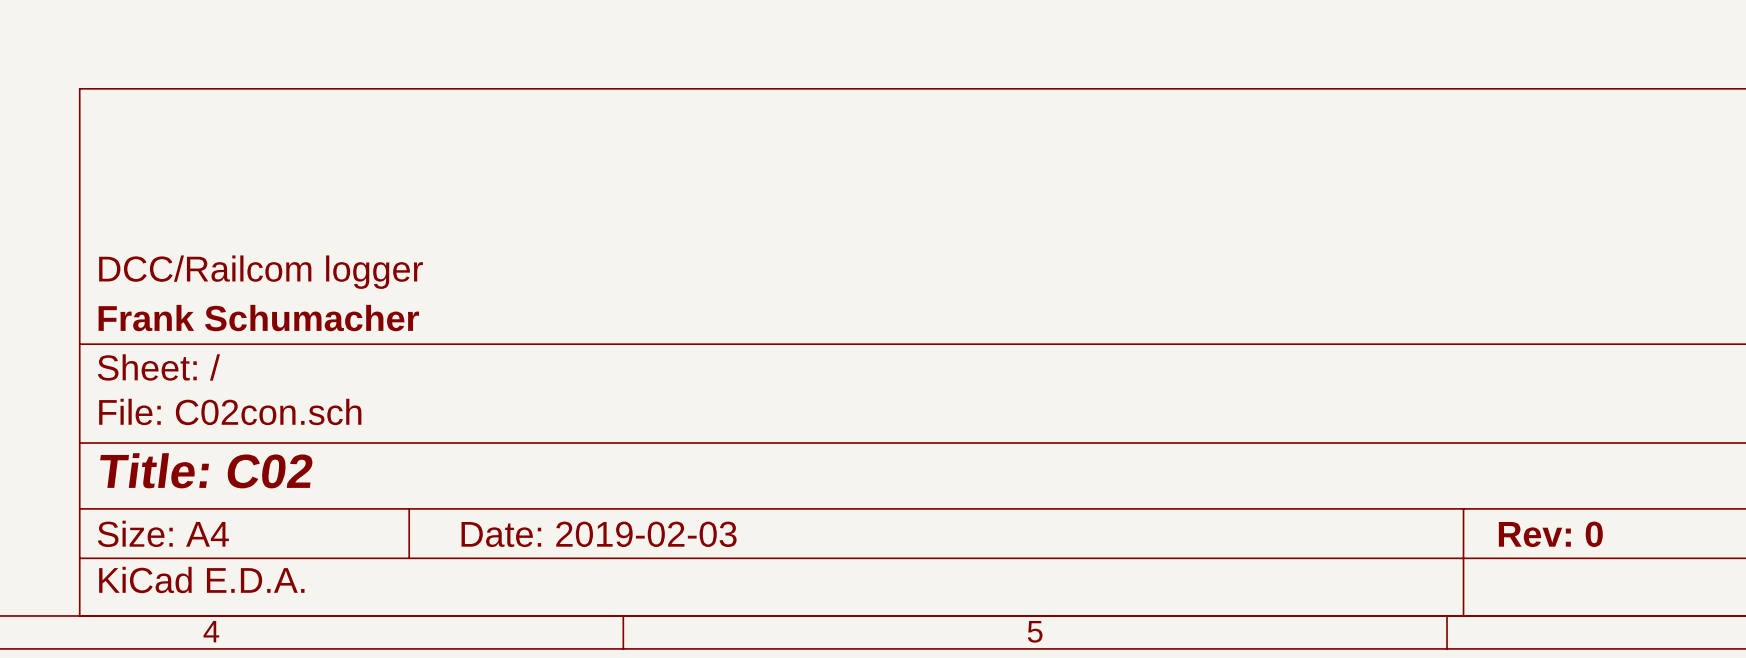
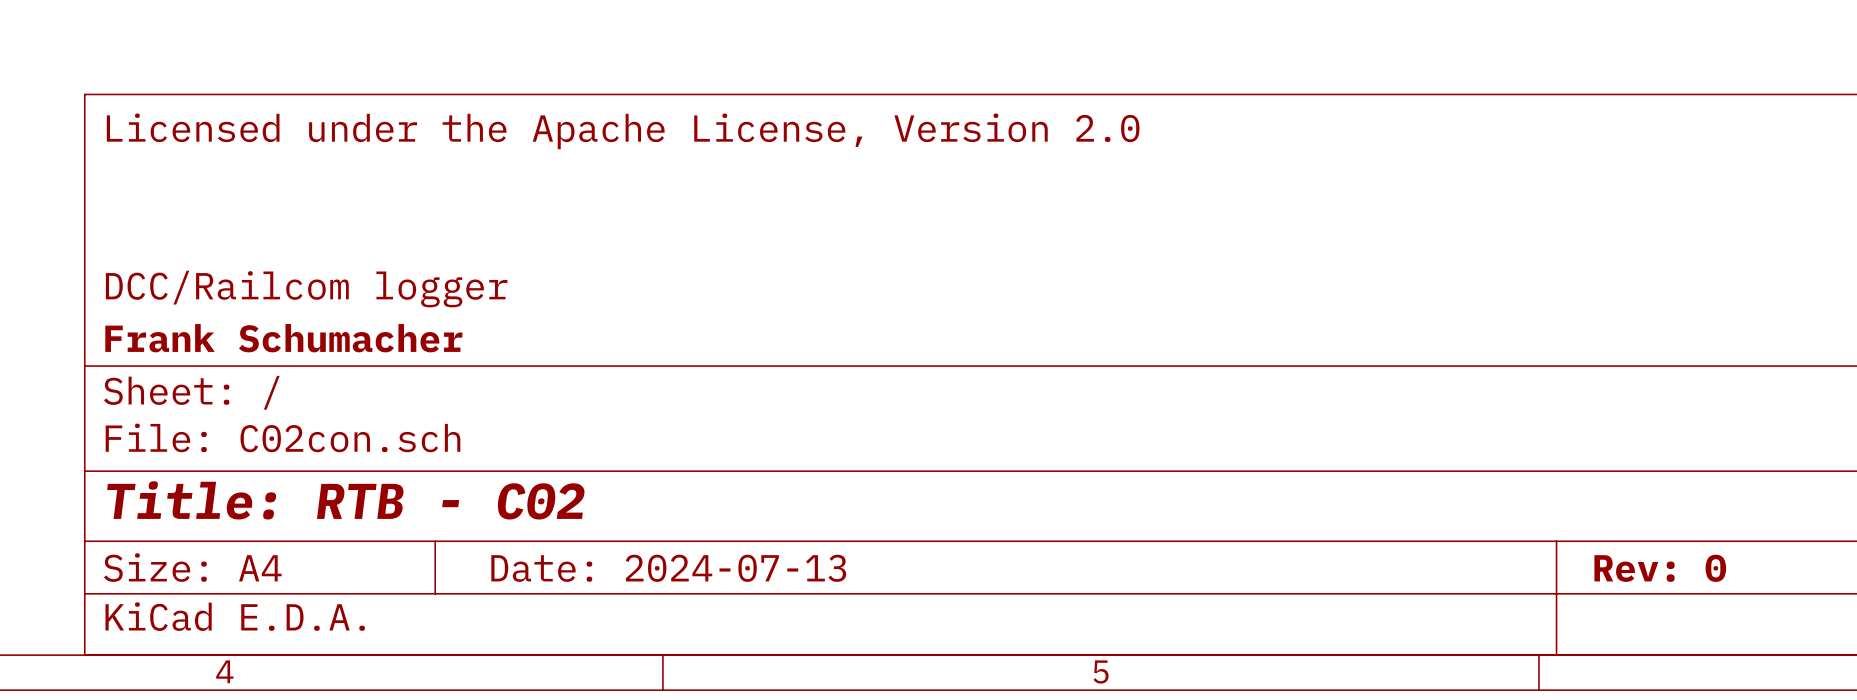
title block: none -> Licensed under the Apache License, Version 2.0 (623, 131)
title block: Title: C02 (206, 470) -> Title: RTB - C02 (345, 500)
title block: Date: 2019-02-03 (599, 534) -> Date: 2024-07-13 (668, 568)

